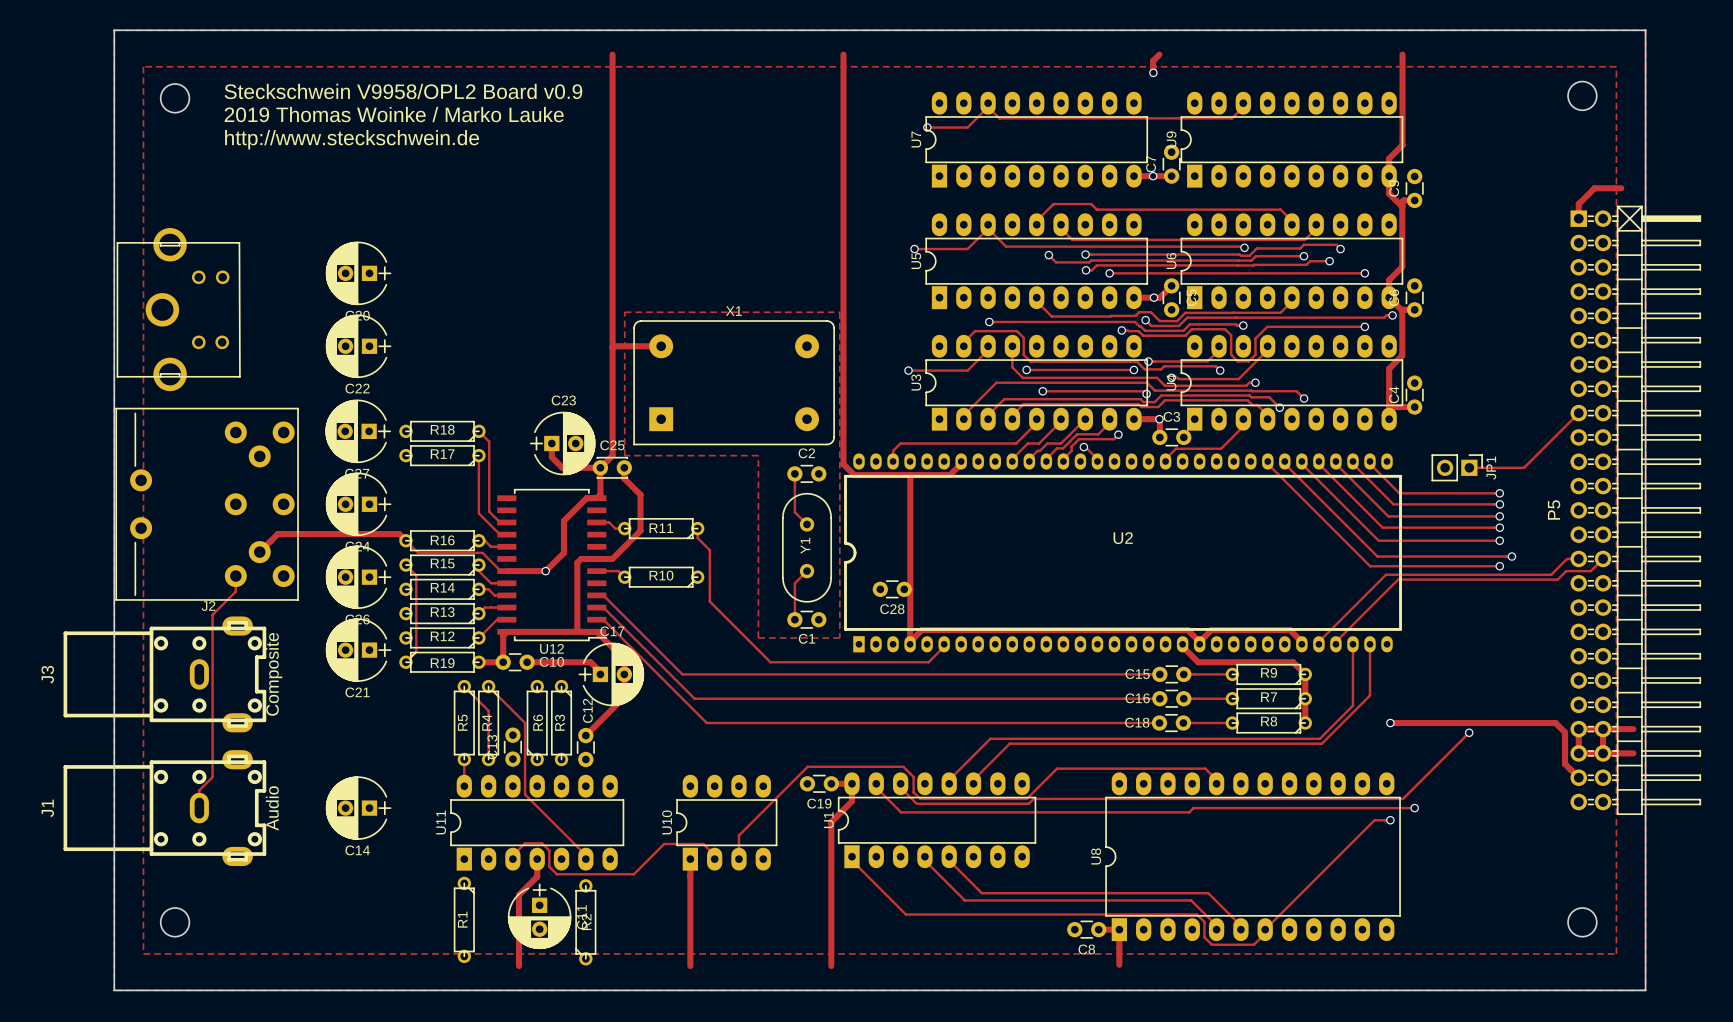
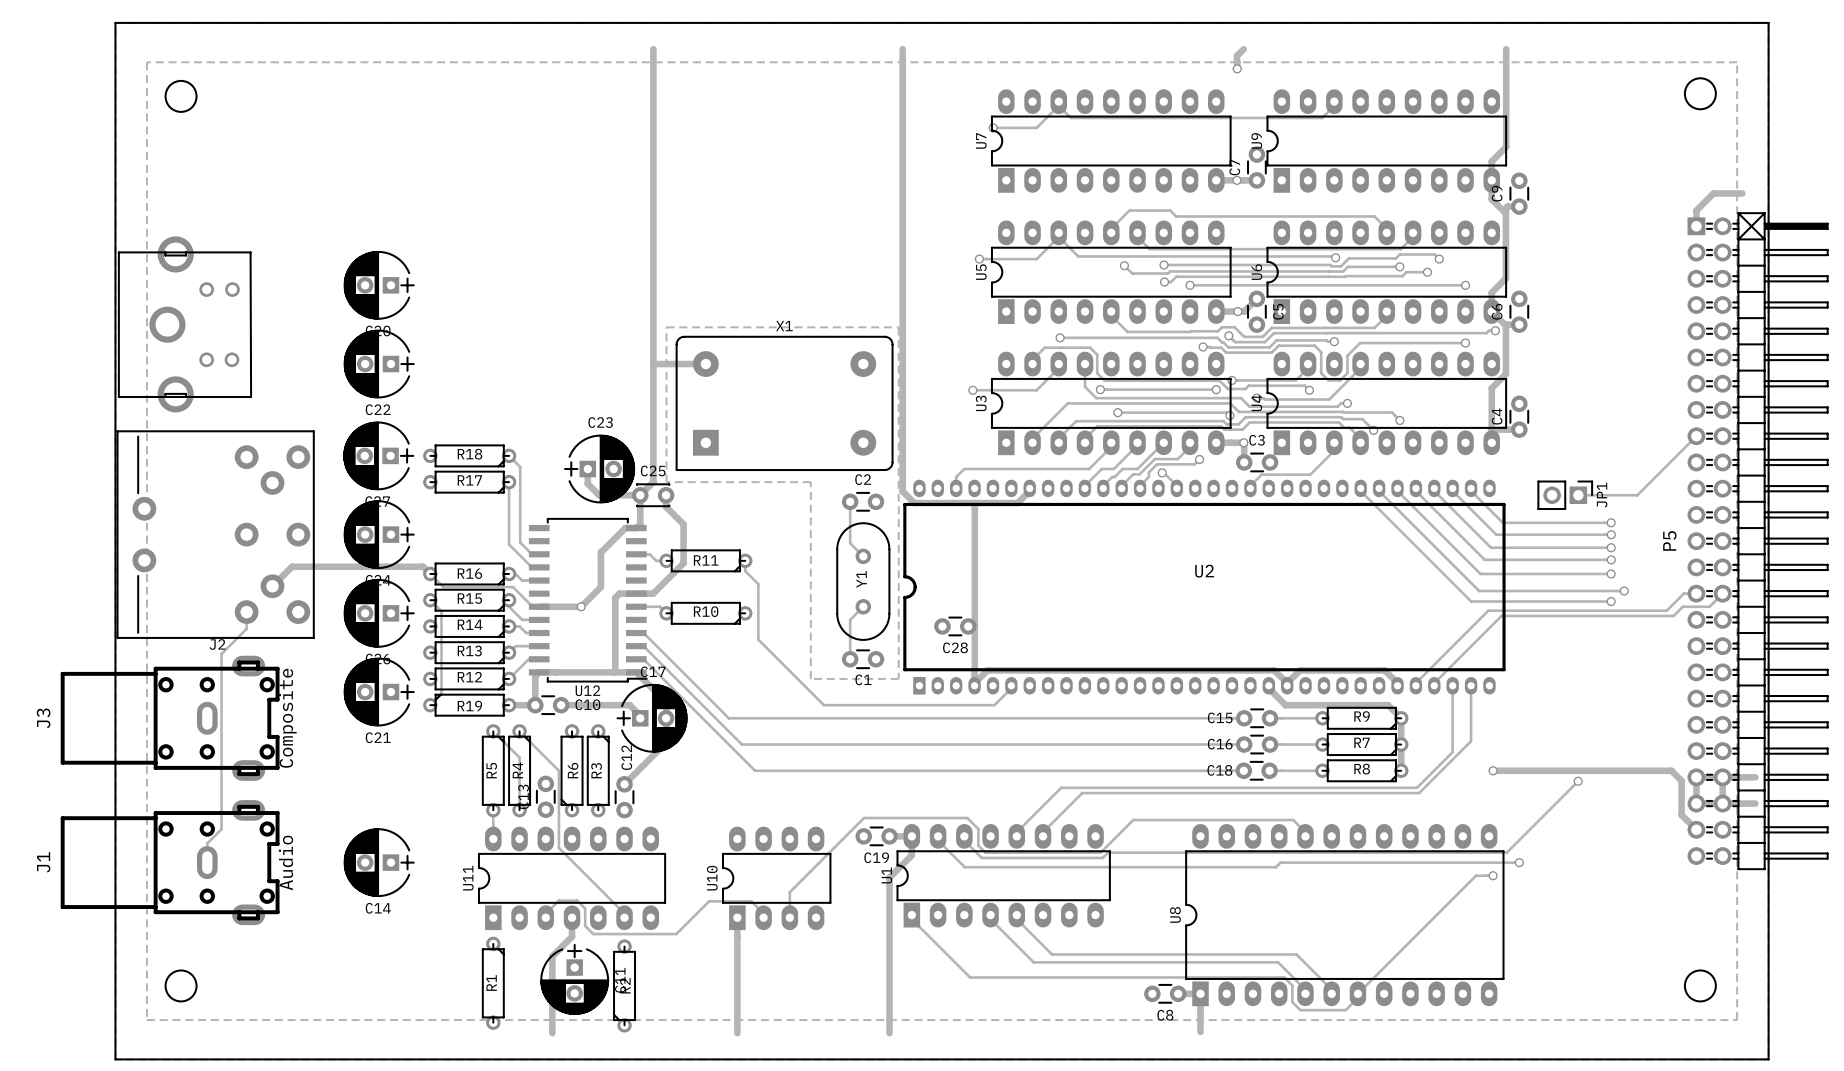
text: Steckschwein V9958/OPL2 Board v0.9 (403, 91) -> none
text: 2019 Thomas Woinke / Marko Lauke (394, 114) -> none
text: http://www.steckschwein.de (352, 139) -> none

